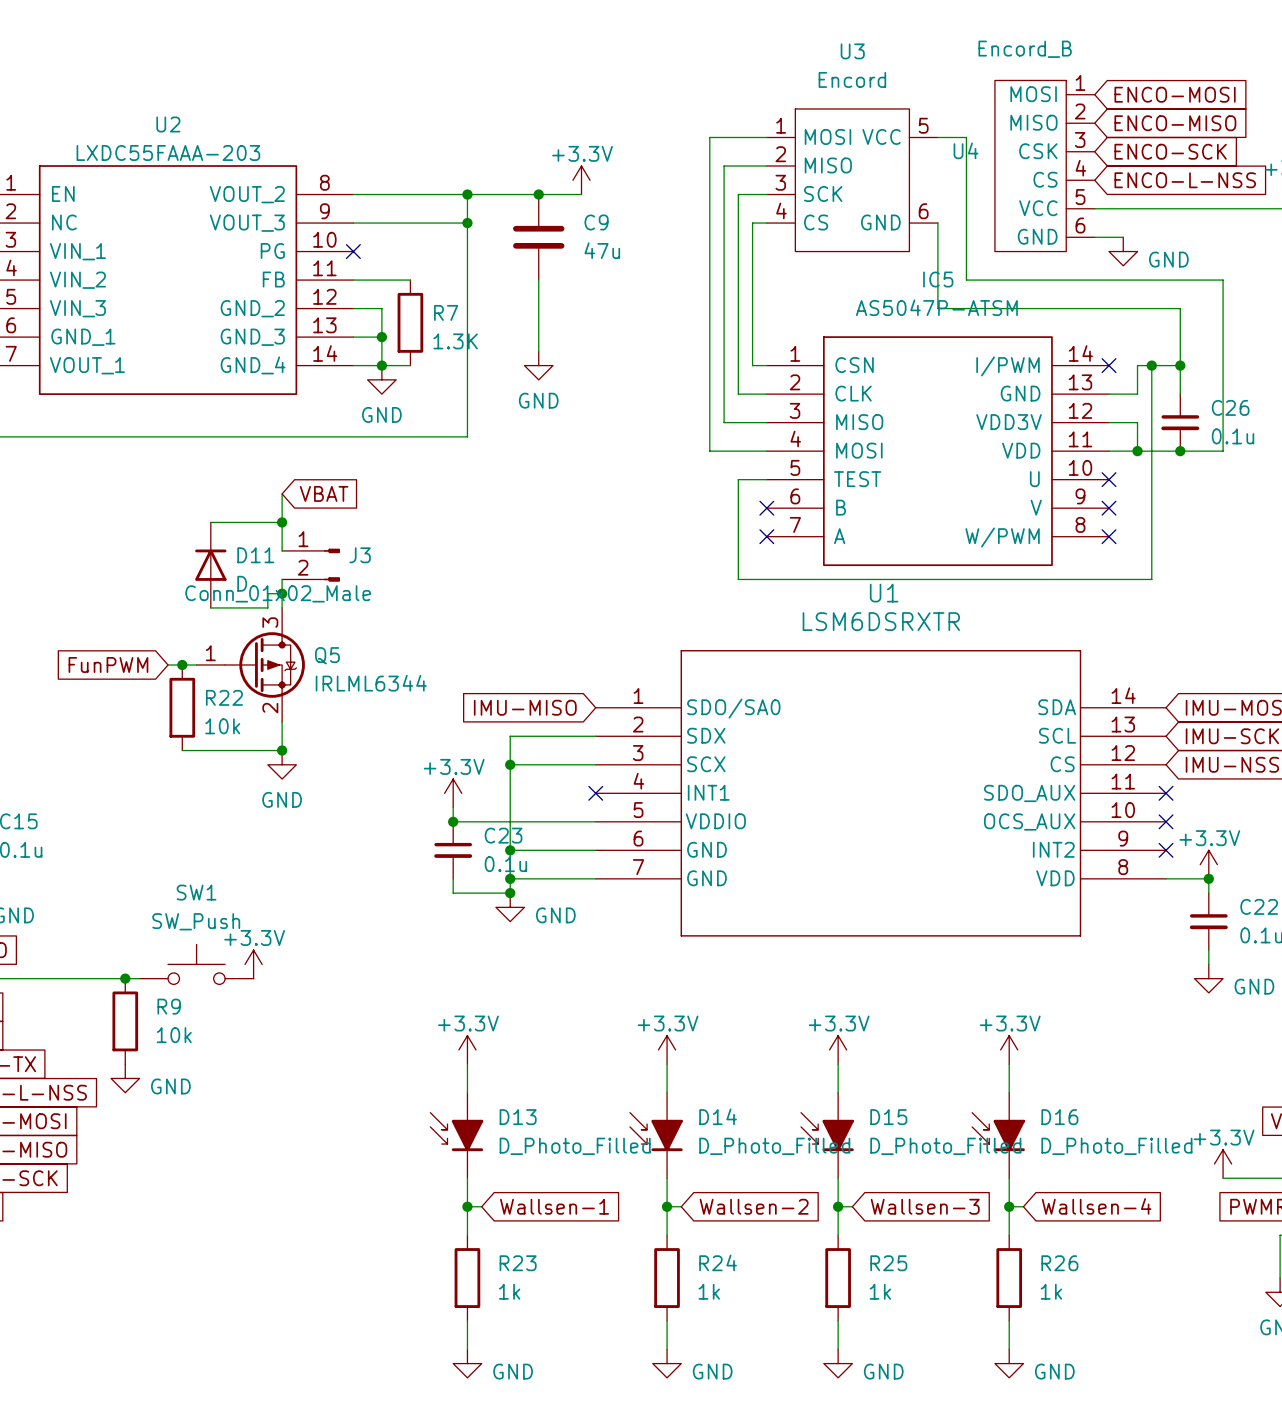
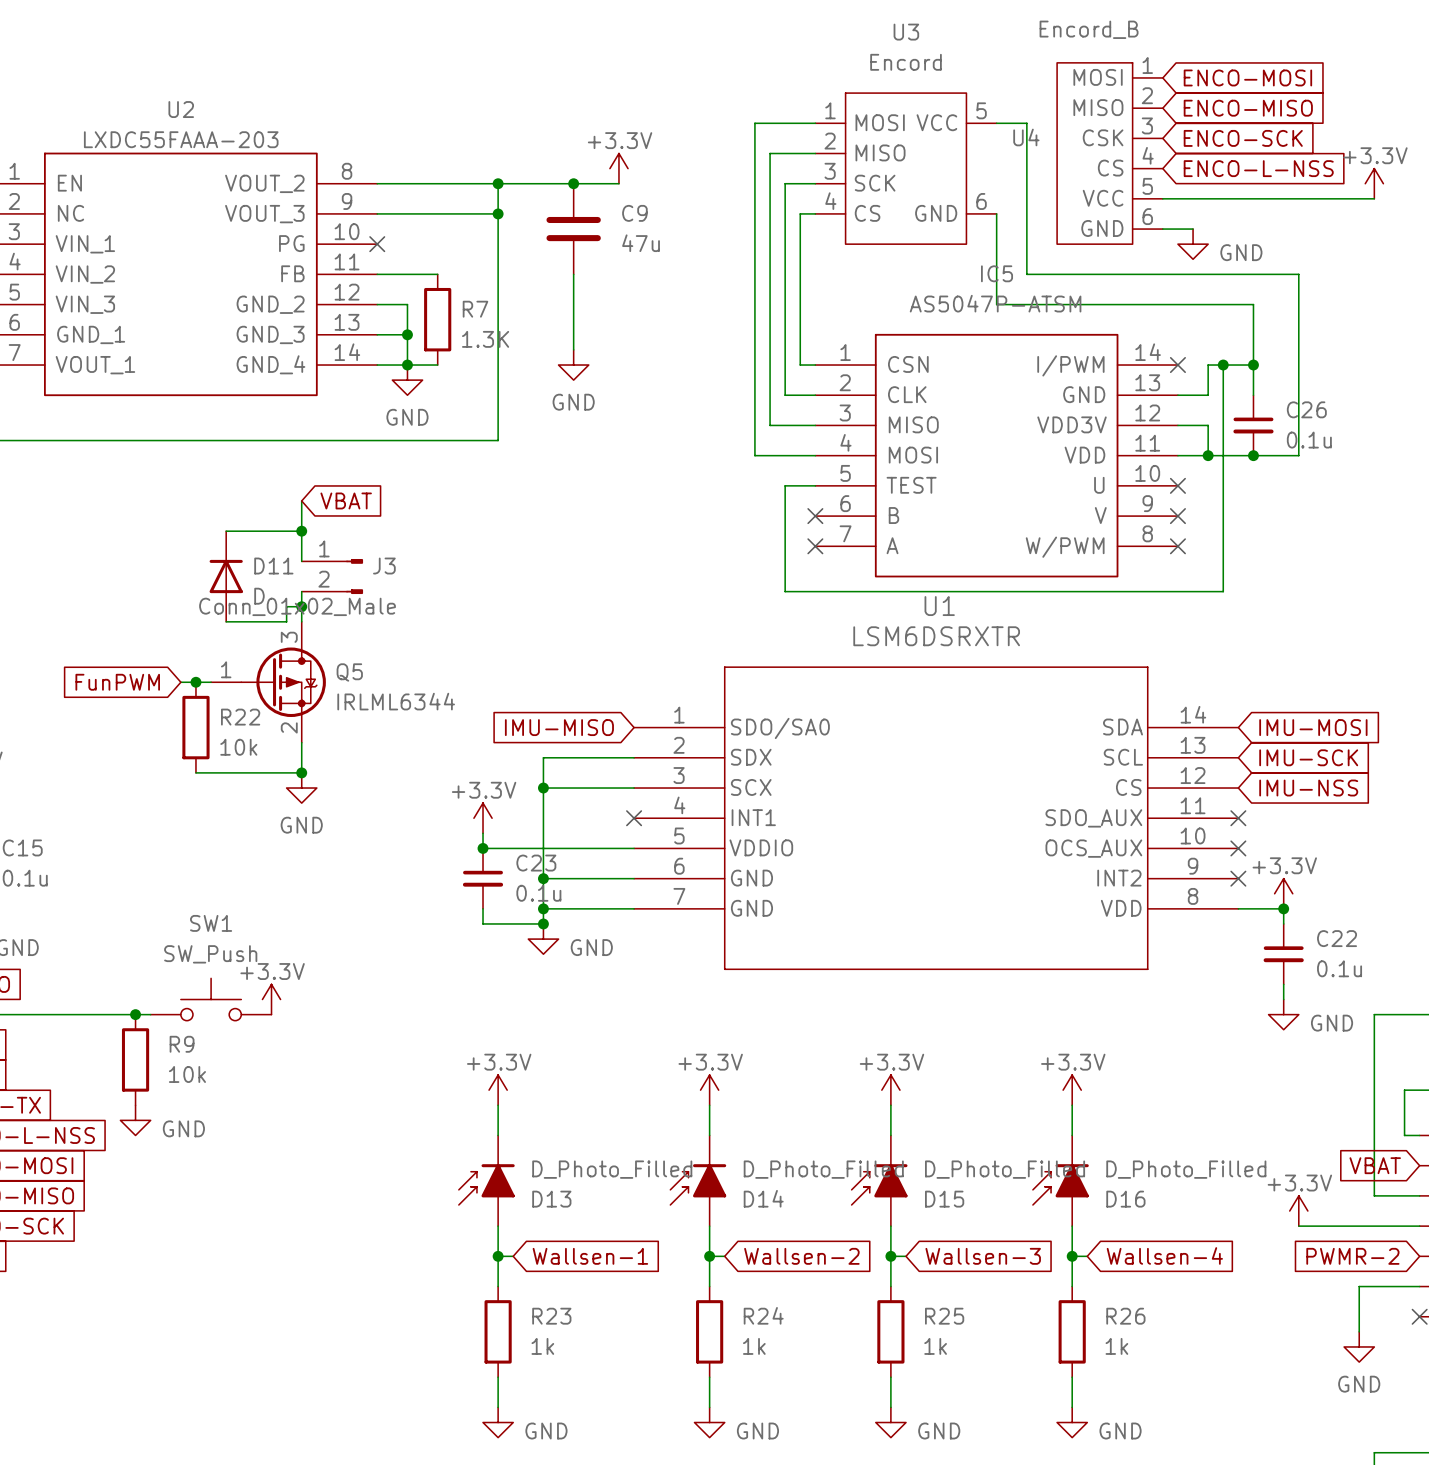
D13 flip: as is (456, 1131) -> up-down (486, 1184)
D14 flip: as is (656, 1131) -> up-down (698, 1184)
D15 flip: as is (827, 1131) -> up-down (879, 1184)
D16 flip: as is (998, 1131) -> up-down (1060, 1184)

